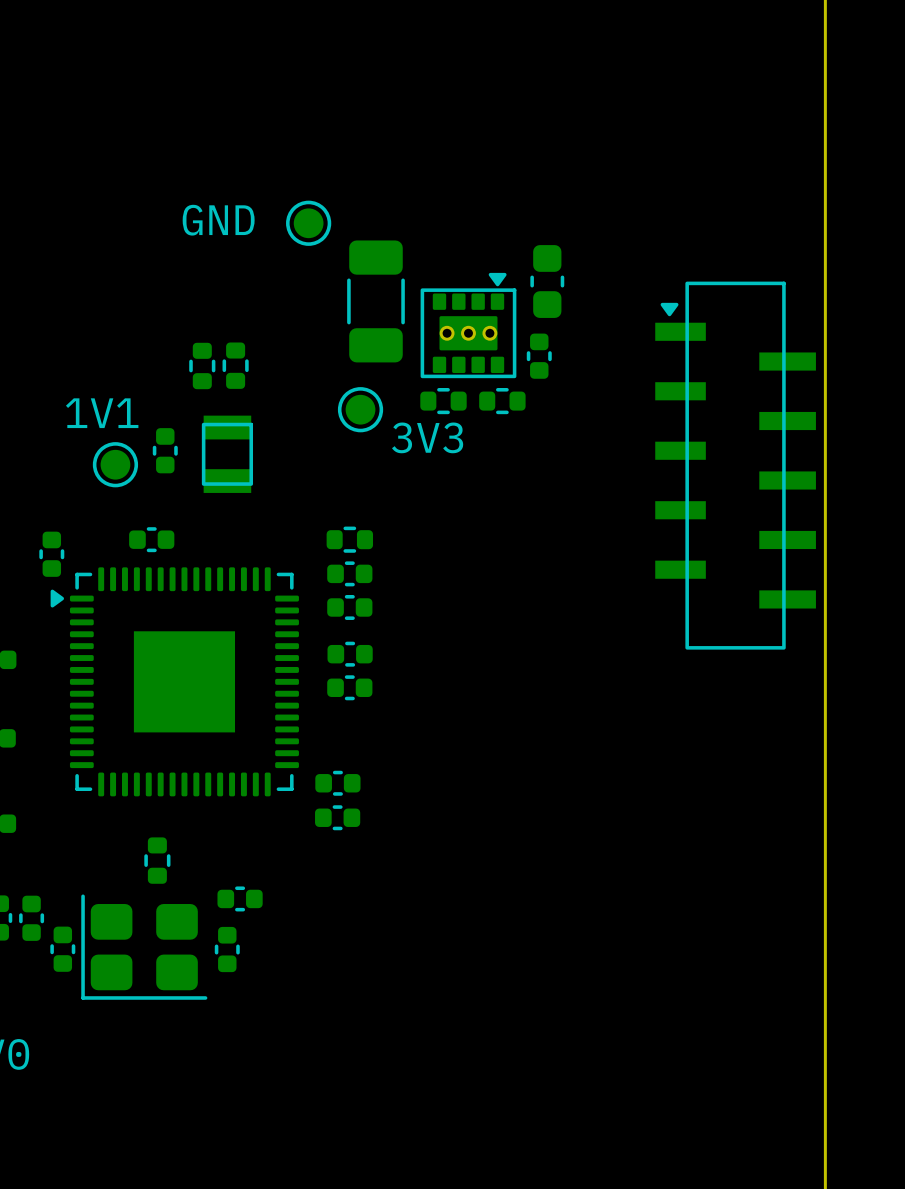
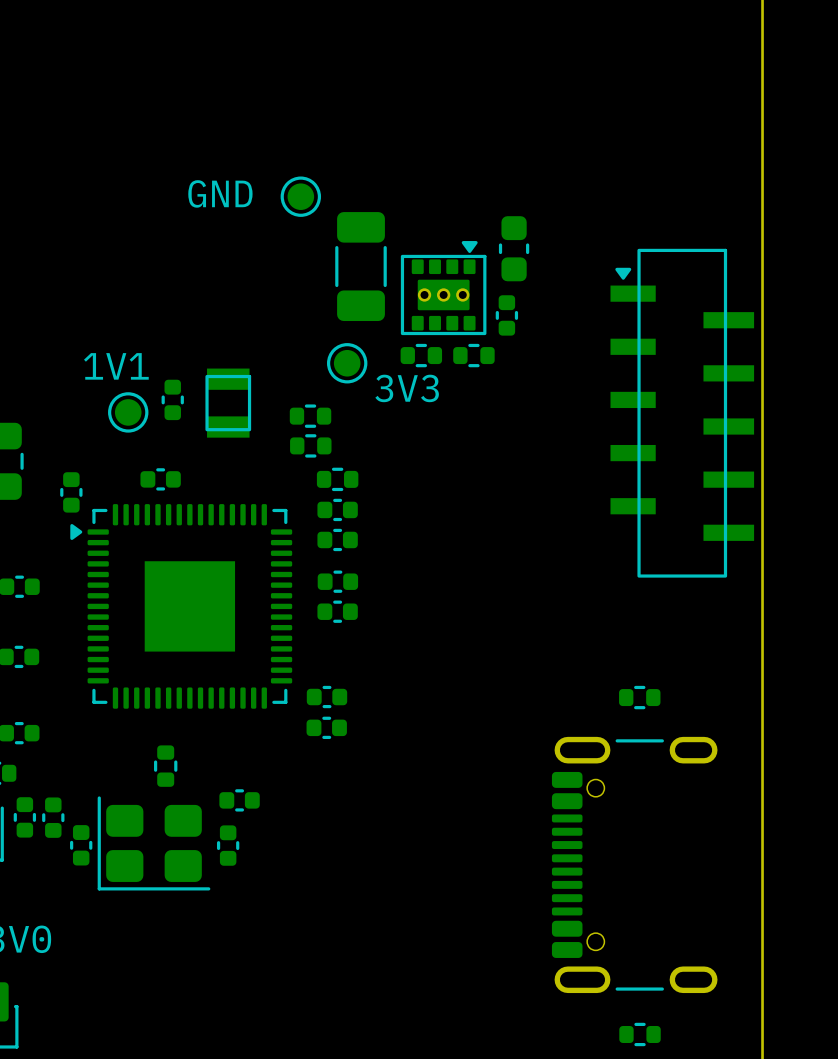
part: (202, 365) -> none
part: (235, 365) -> none
part: none -> (310, 416)
part: none -> (310, 445)
part: none -> (639, 697)
part: none -> (634, 864)
part: none -> (640, 1034)

